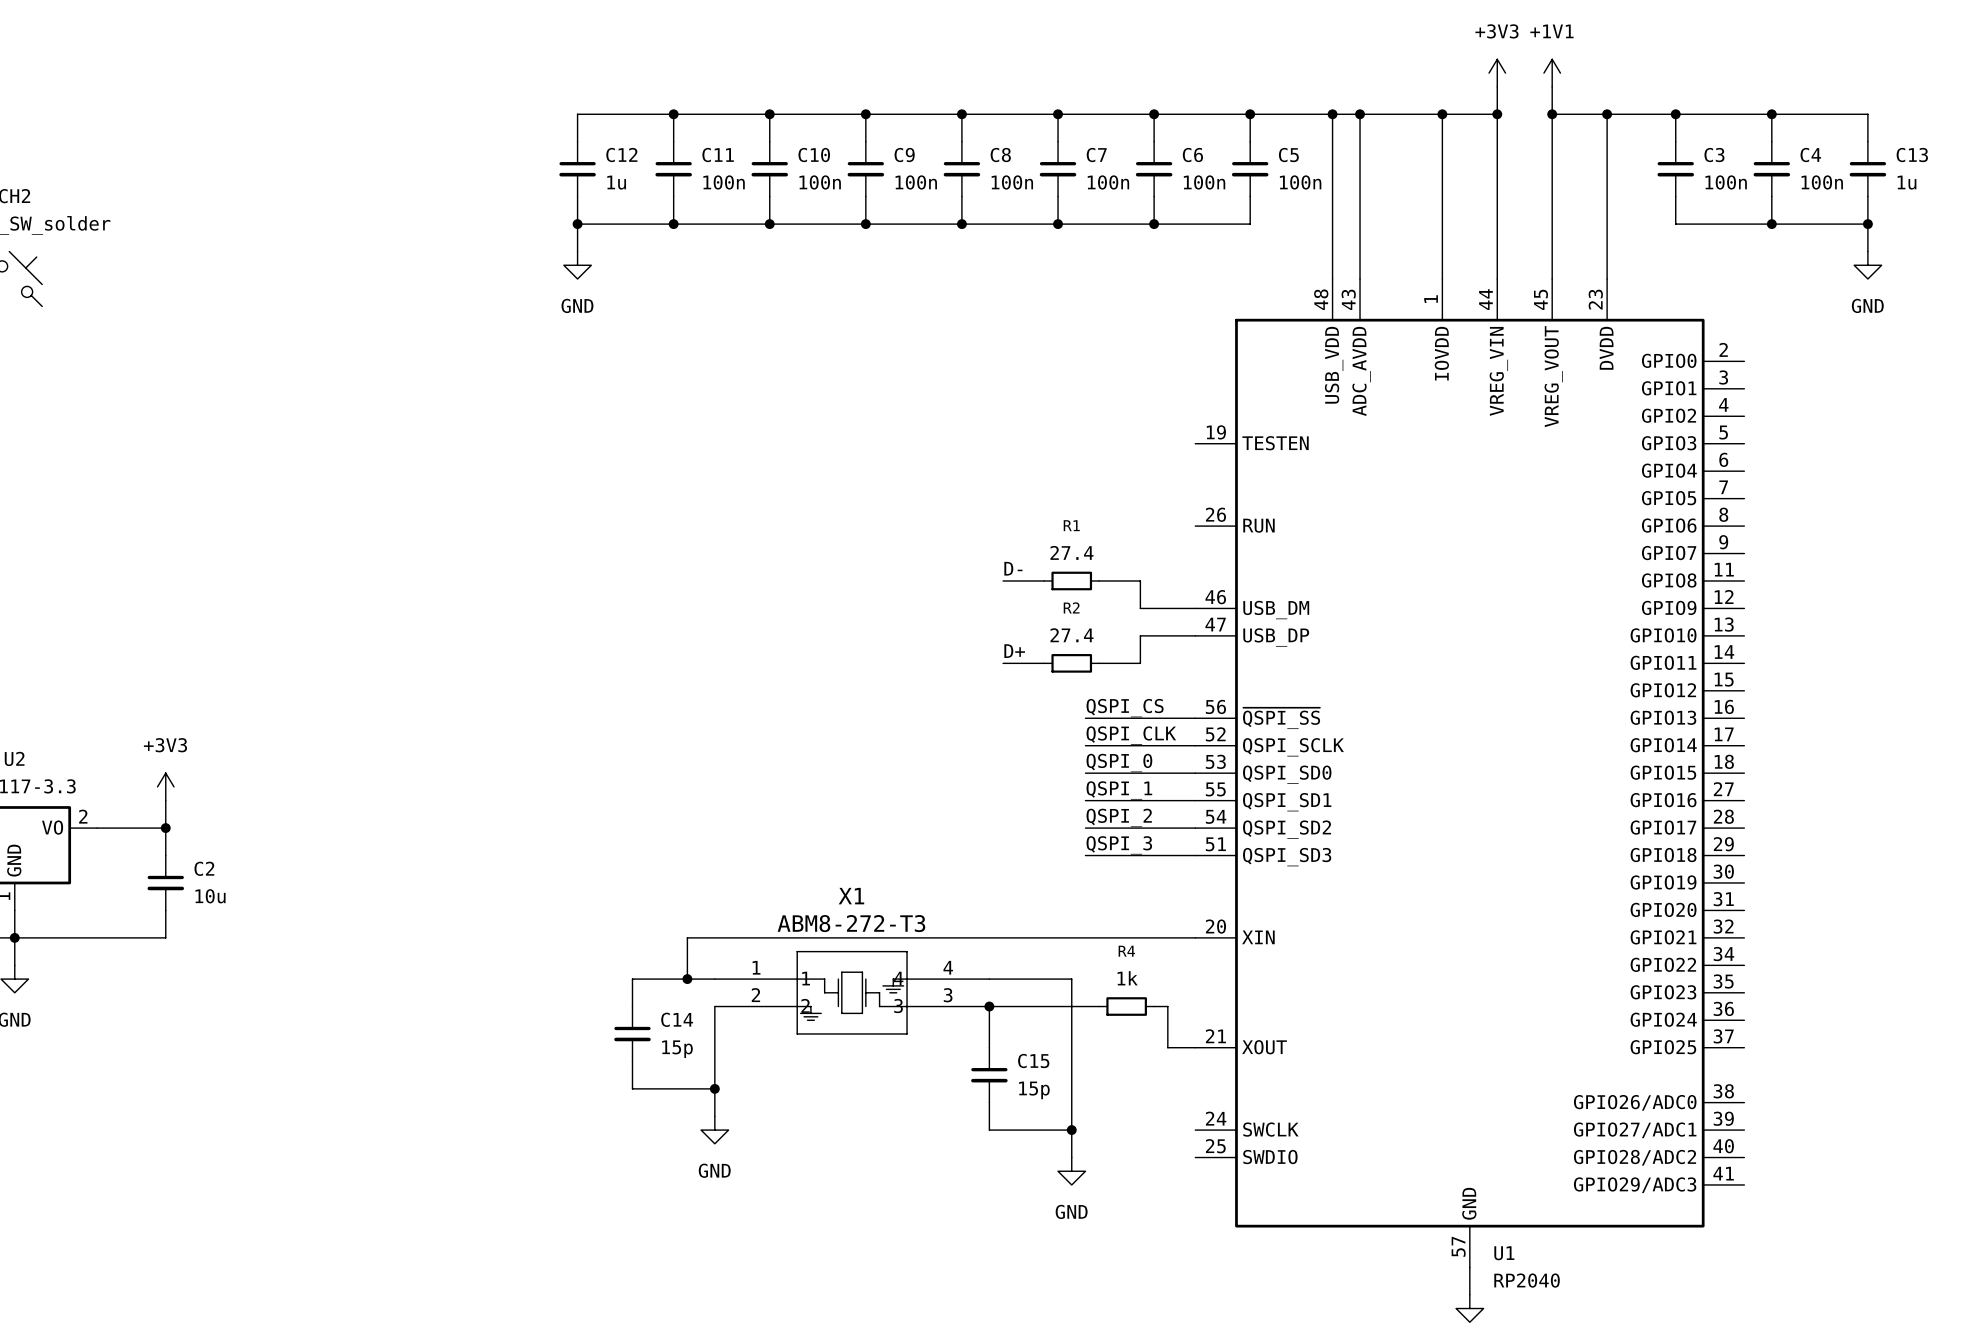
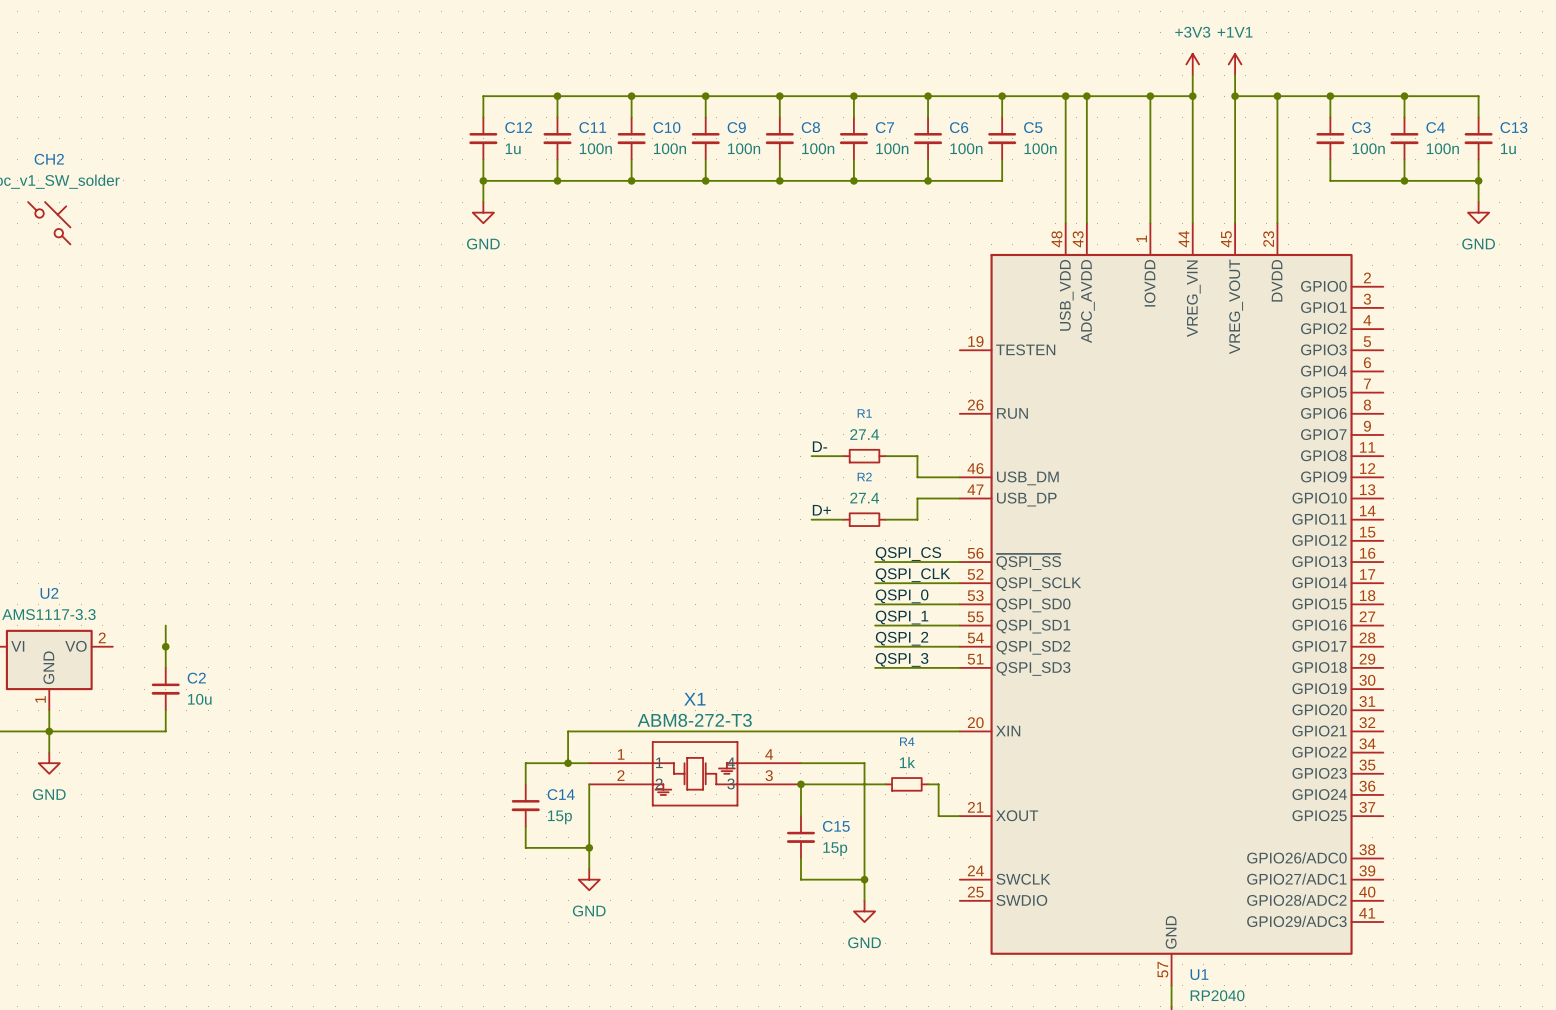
power symbol: +3V3 (165, 786) -> none
wire: (97, 828) (165, 828) -> none

